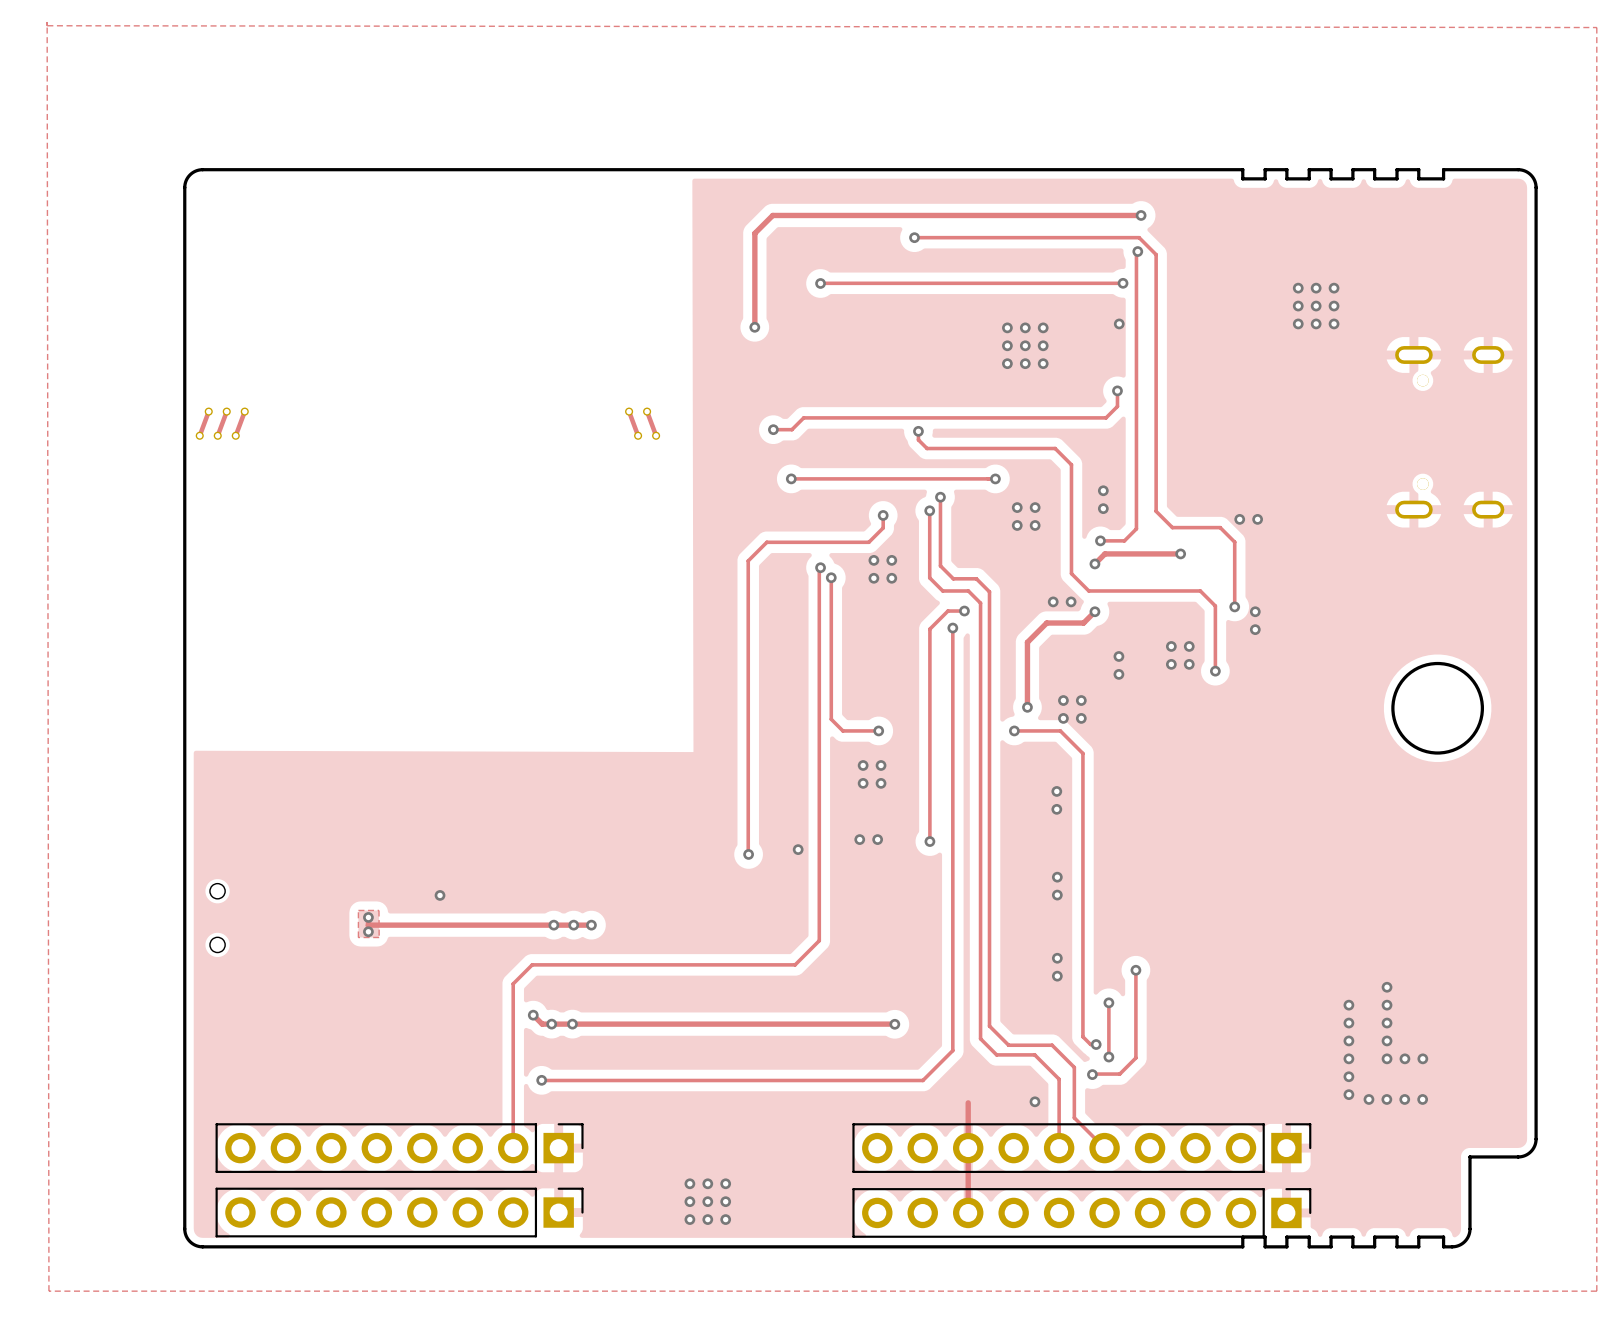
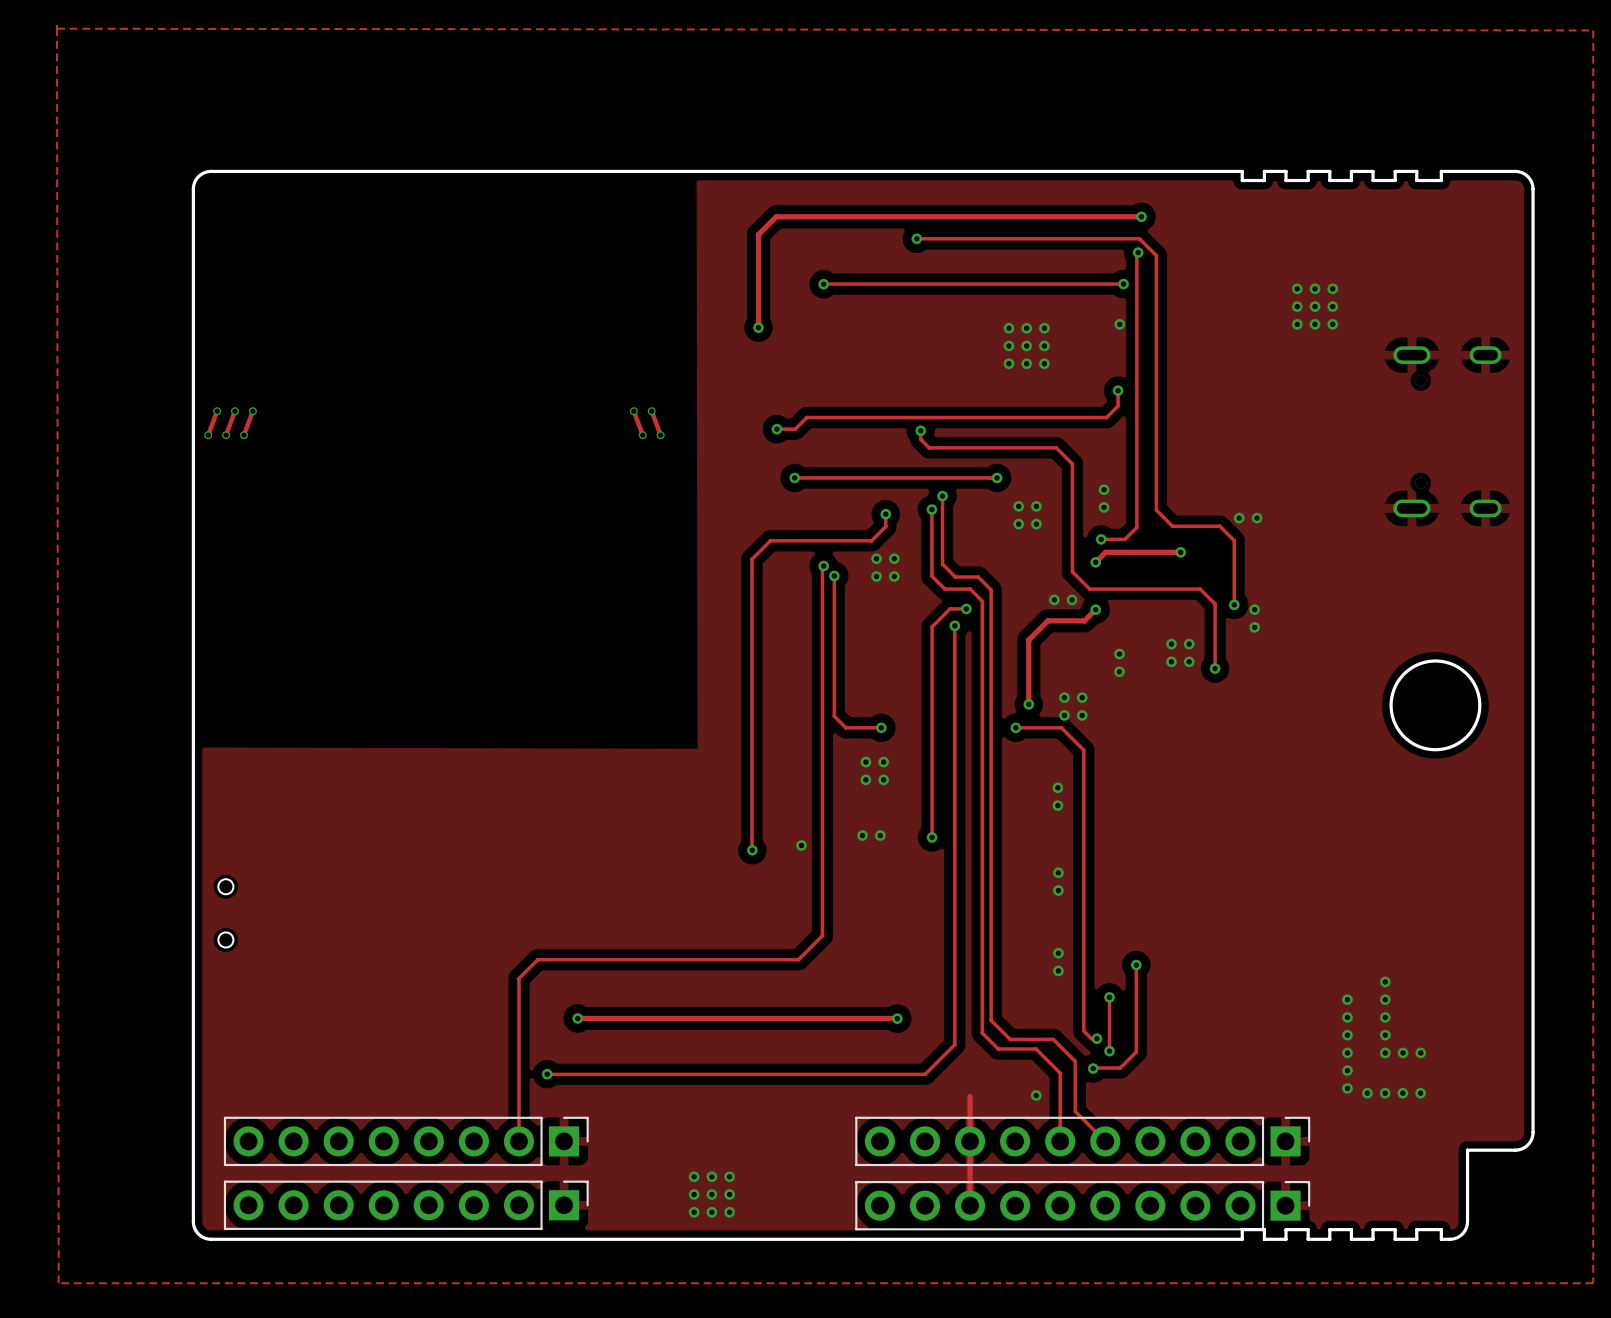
via: (440, 895) -> none
zone outline: (358, 910) (358, 937) (379, 937) (378, 910) (358, 910) -> none
via: (368, 917) -> none
track: (368, 925) (591, 925) -> none
via: (553, 925) -> none
via: (573, 925) -> none
via: (591, 925) -> none
via: (368, 931) -> none
track: (533, 1015) (542, 1024) (572, 1024) -> none
via: (533, 1015) -> none
via: (551, 1024) -> none

